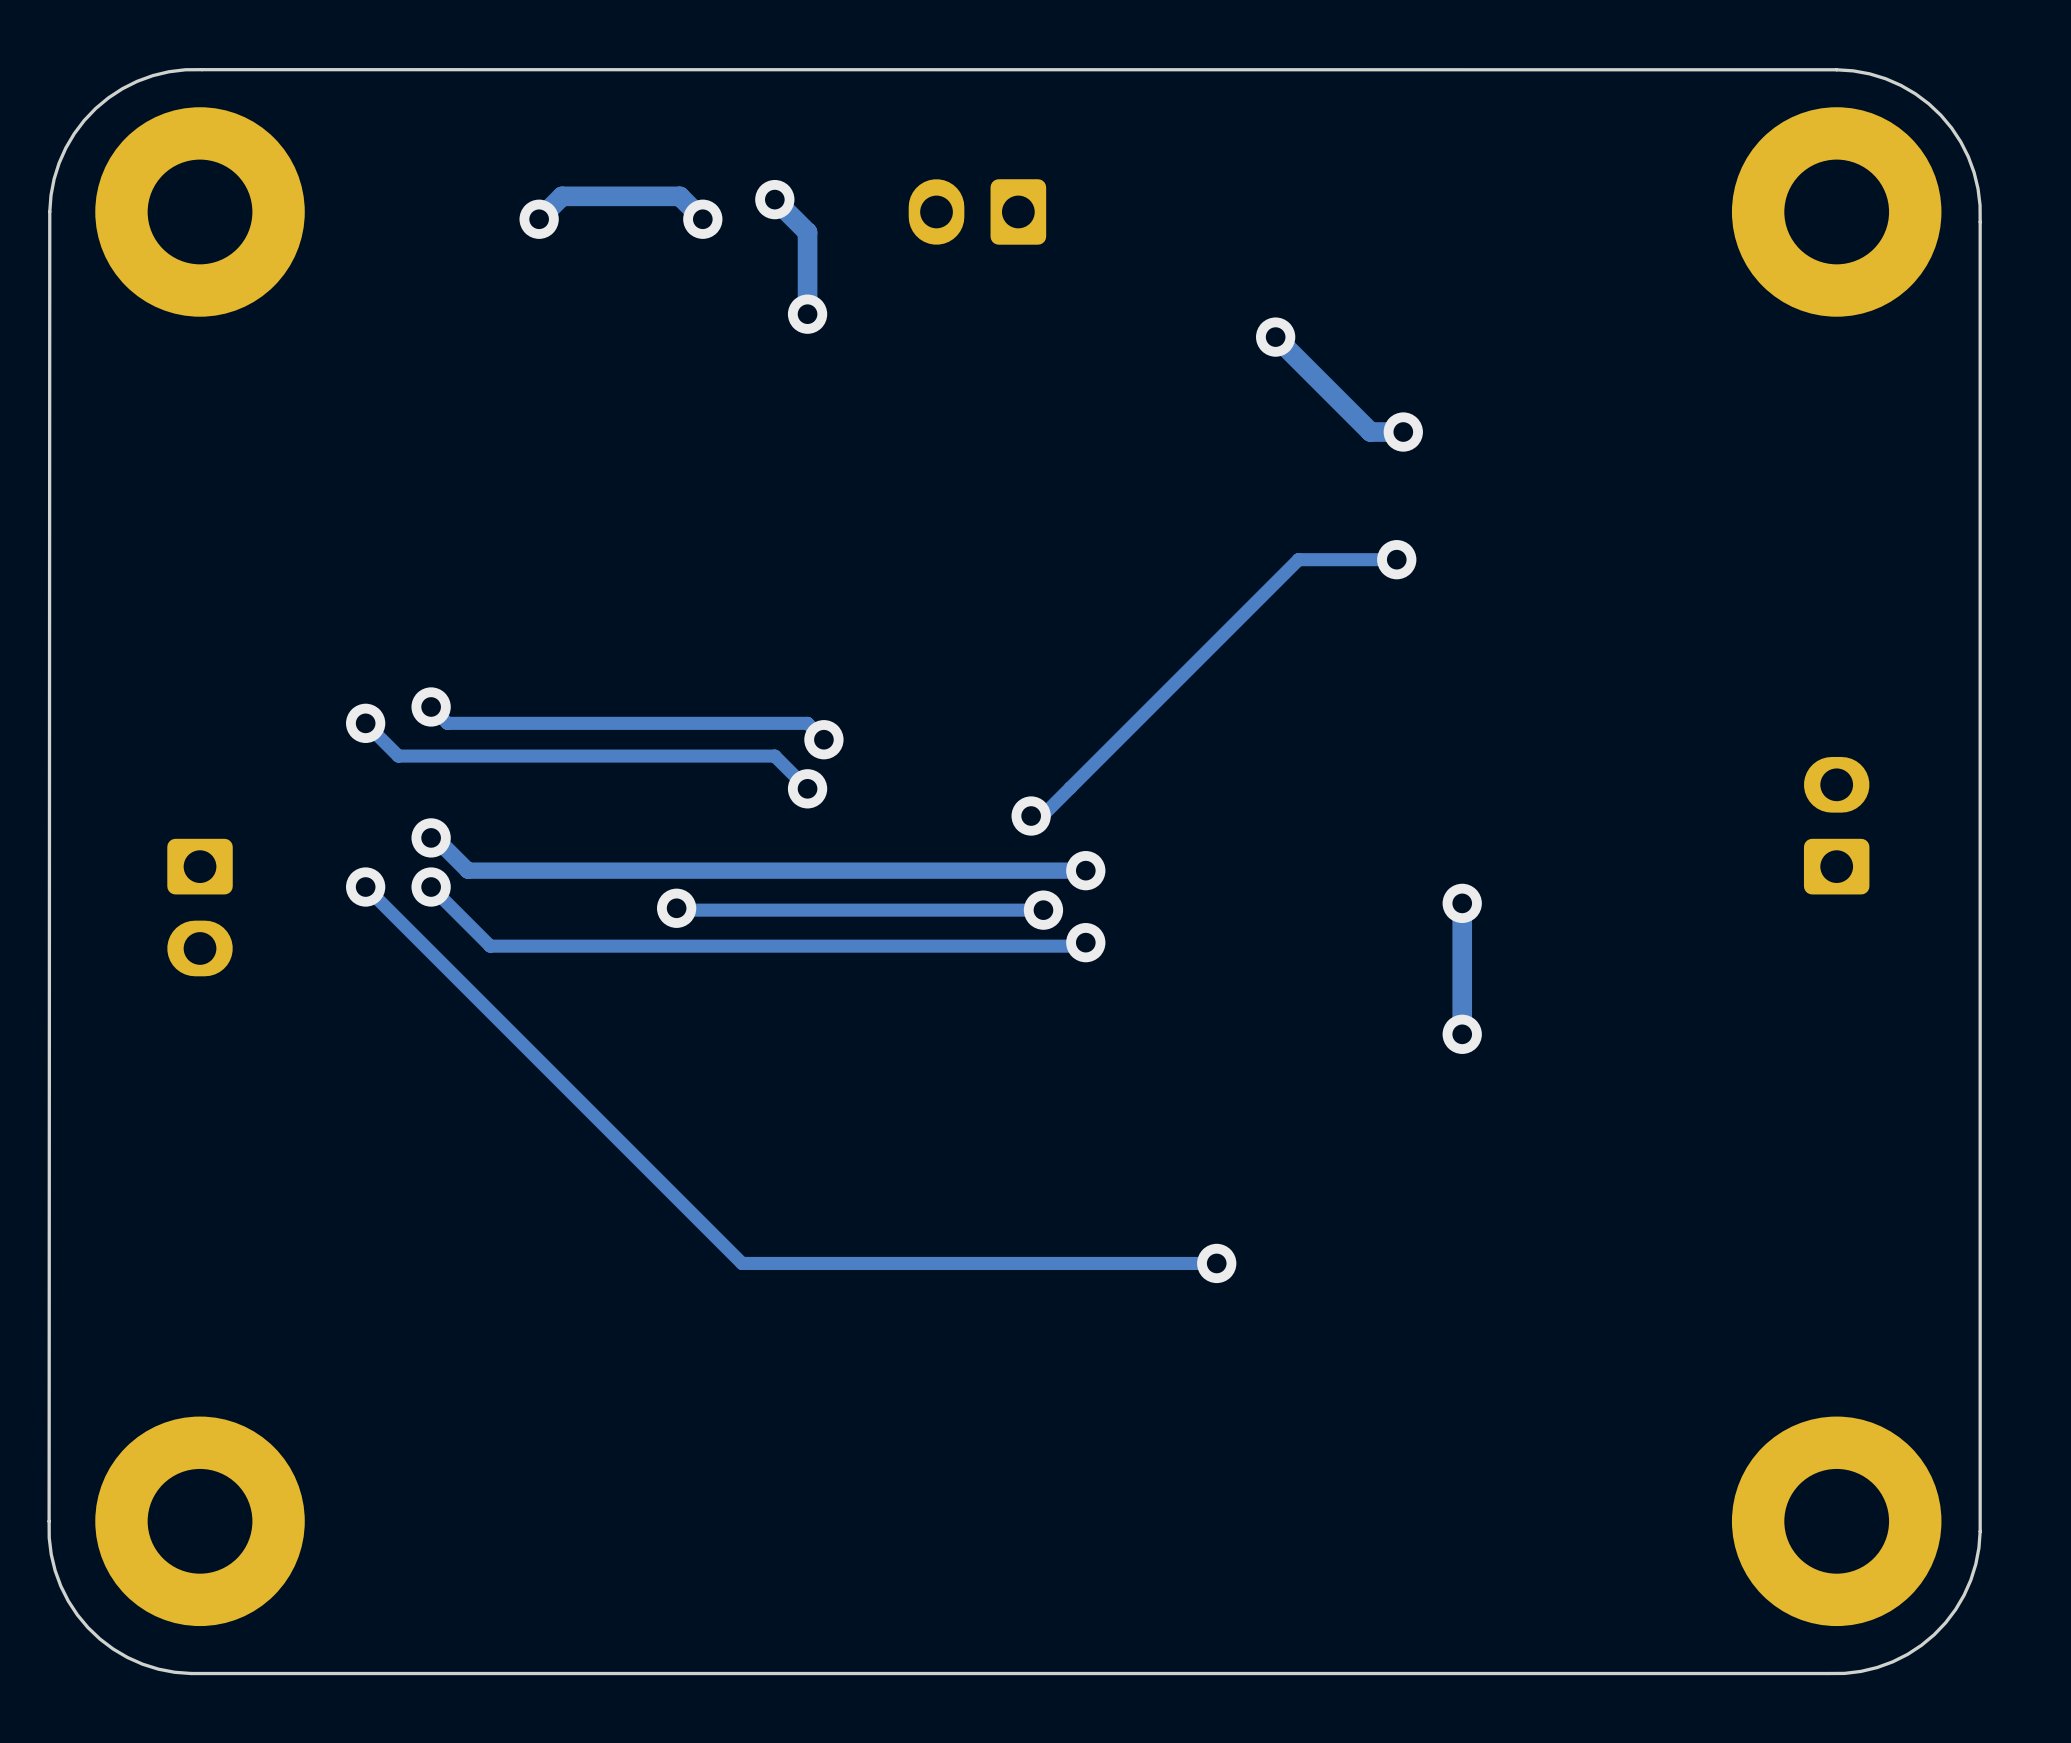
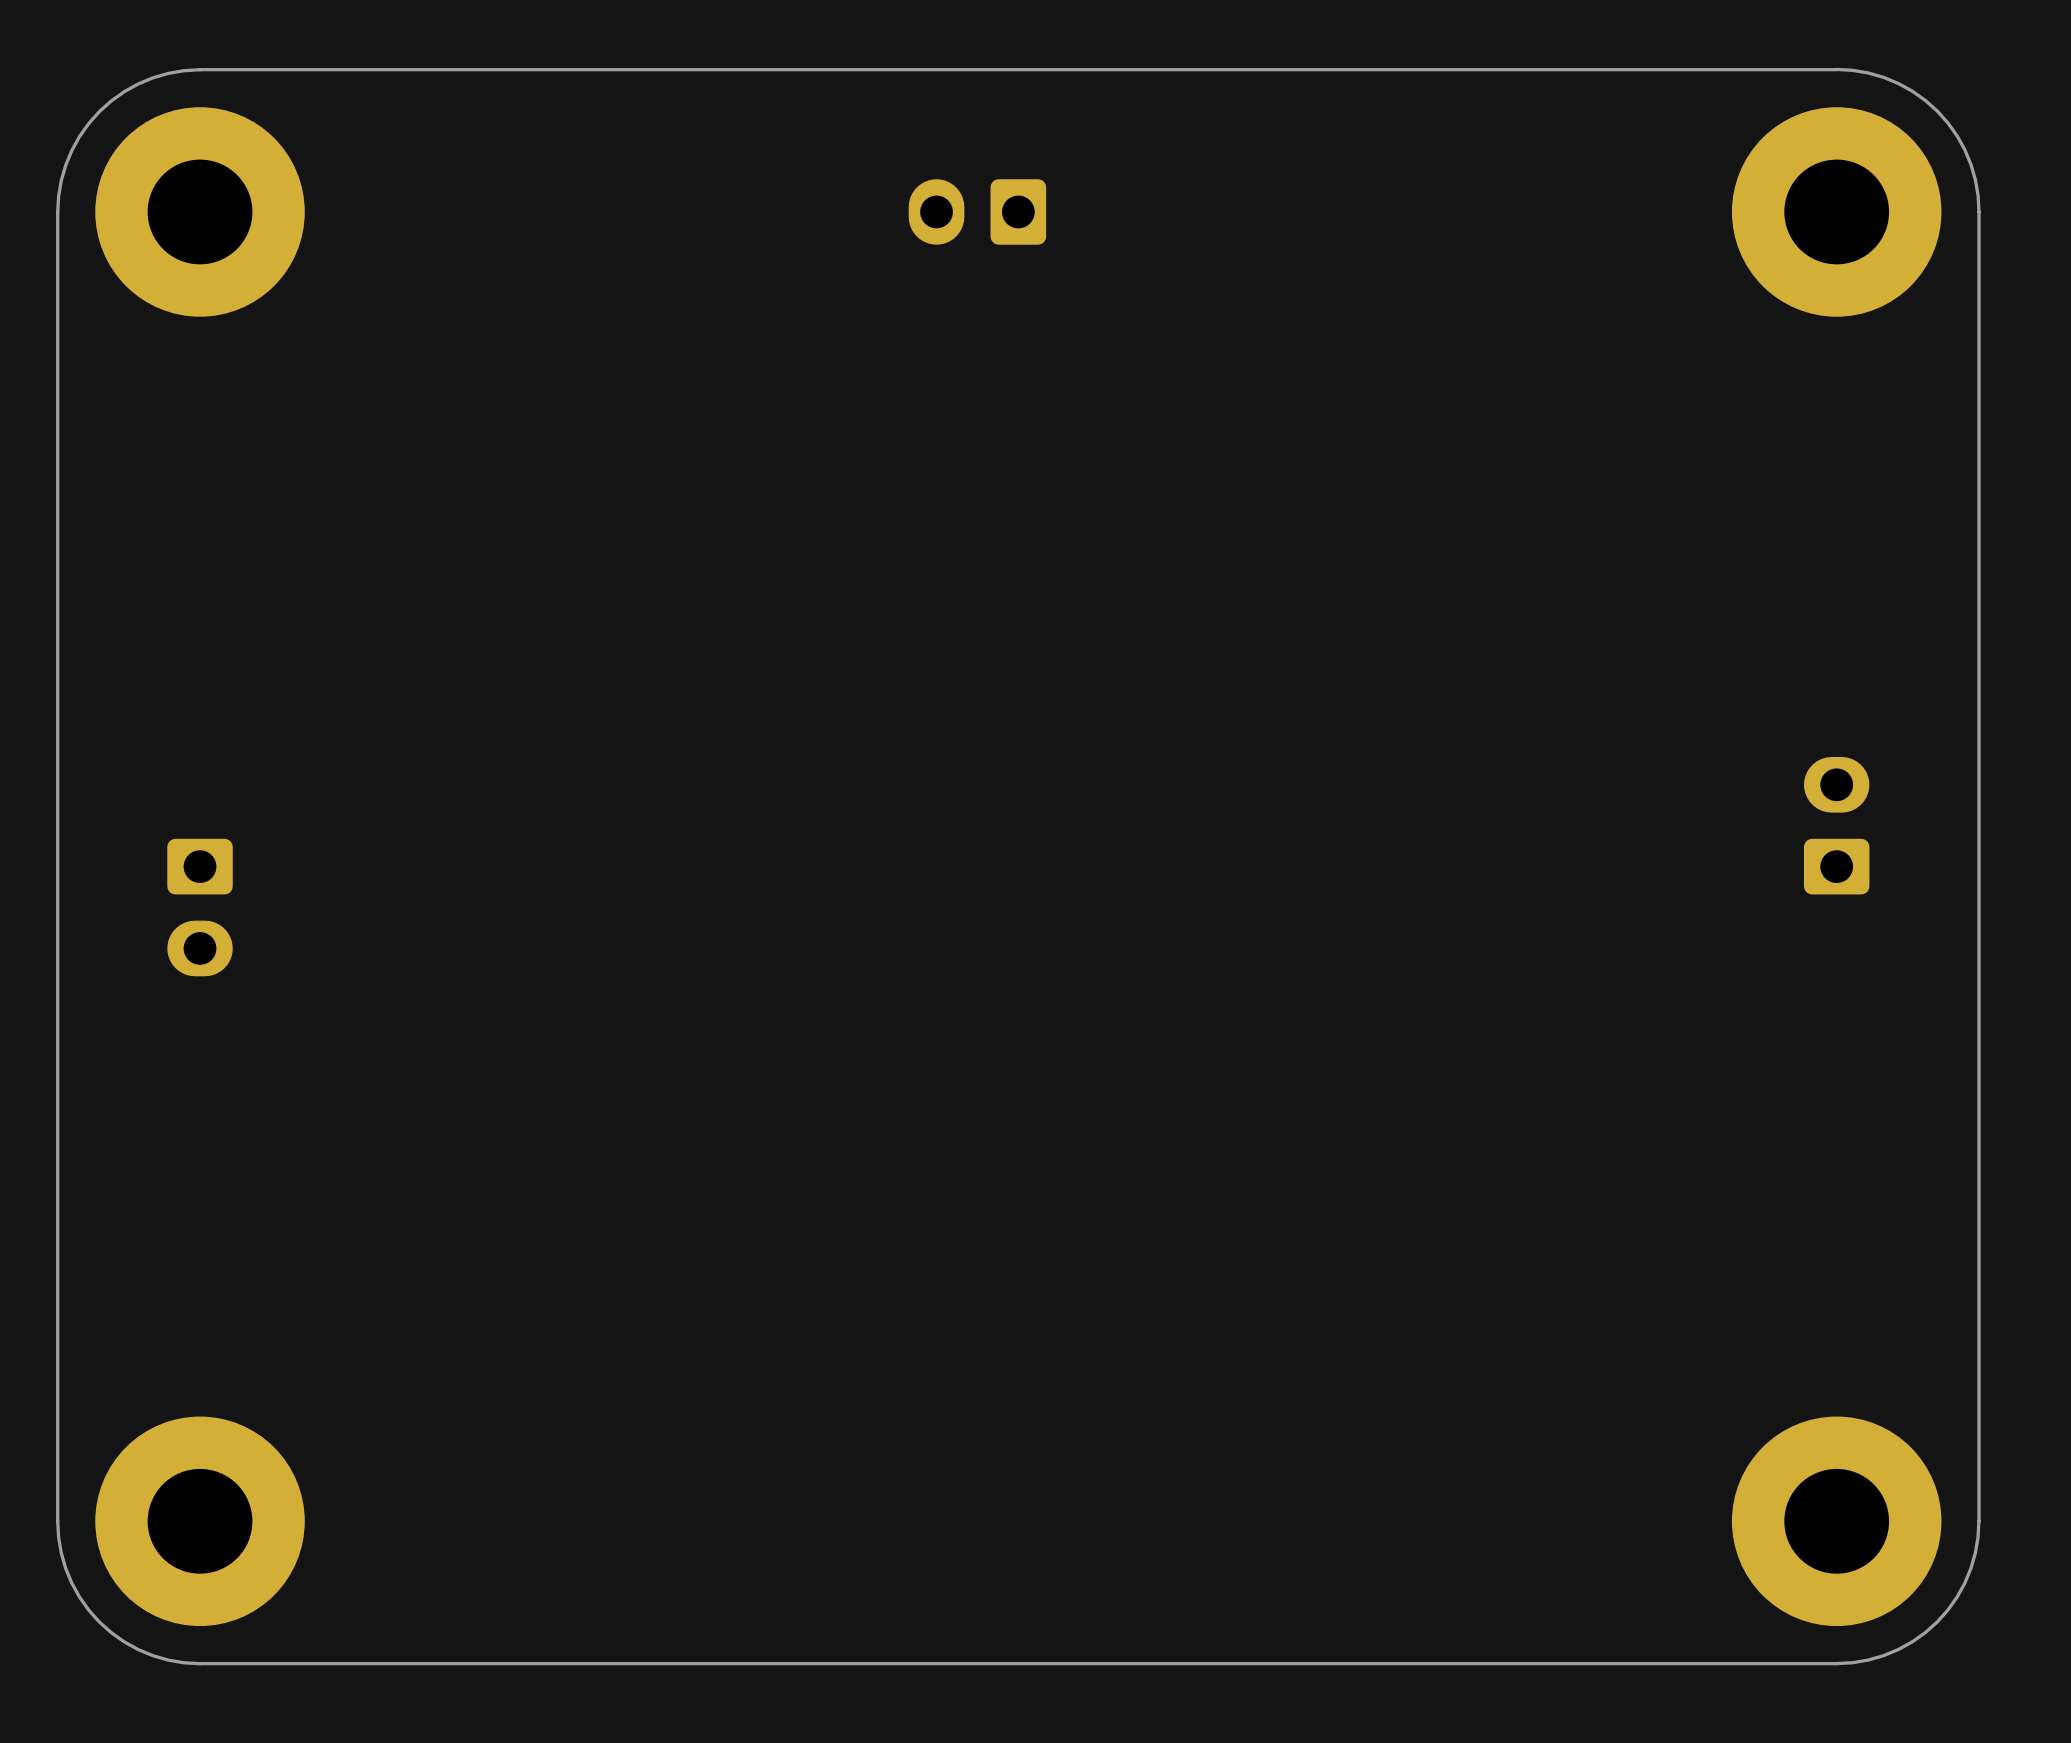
board edge: (1836, 69) (185, 69) (168, 71) (137, 81) (108, 97) (95, 108) (84, 120) (65, 147) (54, 178) (49, 211) (49, 1537) (51, 1554) (60, 1586) (77, 1614) (87, 1627) (113, 1649) (142, 1664) (174, 1672) (191, 1673) (1844, 1673) (1861, 1671) (1892, 1661) (1907, 1654) (1934, 1634) (1945, 1622) (1964, 1595) (1975, 1564) (1980, 1531) (1980, 205) (1974, 172) (1968, 156) (1951, 128) (1928, 103) (1901, 85) (1885, 78) (1853, 70) (1836, 69) -> (1979, 1521) (1978, 196) (1971, 164) (1957, 136) (1937, 111) (1925, 100) (1912, 91) (1883, 77) (1852, 70) (1836, 69)
board edge: none -> (1836, 69) (200, 69) (168, 73) (138, 83) (124, 91) (99, 111) (79, 136) (71, 150) (61, 180) (57, 211) (58, 1537) (65, 1568) (71, 1583) (88, 1610) (99, 1621) (124, 1641) (138, 1649) (168, 1660) (200, 1663)
track: (774, 199) (807, 232) (807, 314) -> none
via: (774, 199) -> none
via: (539, 219) -> none
track: (702, 219) (679, 196) (562, 196) (539, 219) -> none
via: (702, 219) -> none
via: (807, 314) -> none
track: (1275, 337) (1370, 432) (1403, 432) -> none
via: (1275, 337) -> none
via: (1403, 432) -> none
track: (1396, 559) (1298, 559) (1042, 816) (1031, 816) -> none
via: (1396, 559) -> none
track: (431, 706) (447, 723) (807, 723) (823, 739) -> none
via: (431, 706) -> none
track: (365, 723) (398, 756) (774, 756) (807, 788) -> none
via: (365, 723) -> none
via: (823, 739) -> none
via: (807, 788) -> none
via: (1031, 816) -> none
track: (431, 837) (435, 837) (467, 870) (1085, 870) -> none
via: (431, 837) -> none
via: (1085, 870) -> none
track: (365, 887) (742, 1263) (1216, 1263) -> none
via: (365, 887) -> none
track: (431, 887) (490, 946) (1082, 946) (1085, 942) -> none
via: (431, 887) -> none
track: (1462, 903) (1462, 1034) -> none
via: (1462, 903) -> none
track: (676, 908) (678, 910) (1043, 910) -> none
via: (676, 908) -> none
via: (1043, 910) -> none
via: (1085, 942) -> none
via: (1462, 1034) -> none
via: (1216, 1263) -> none
board edge: none -> (1978, 1521) (1975, 1552) (1964, 1583) (1957, 1597) (1937, 1621) (1912, 1641) (1898, 1649) (1868, 1660) (1852, 1662) (200, 1663)

